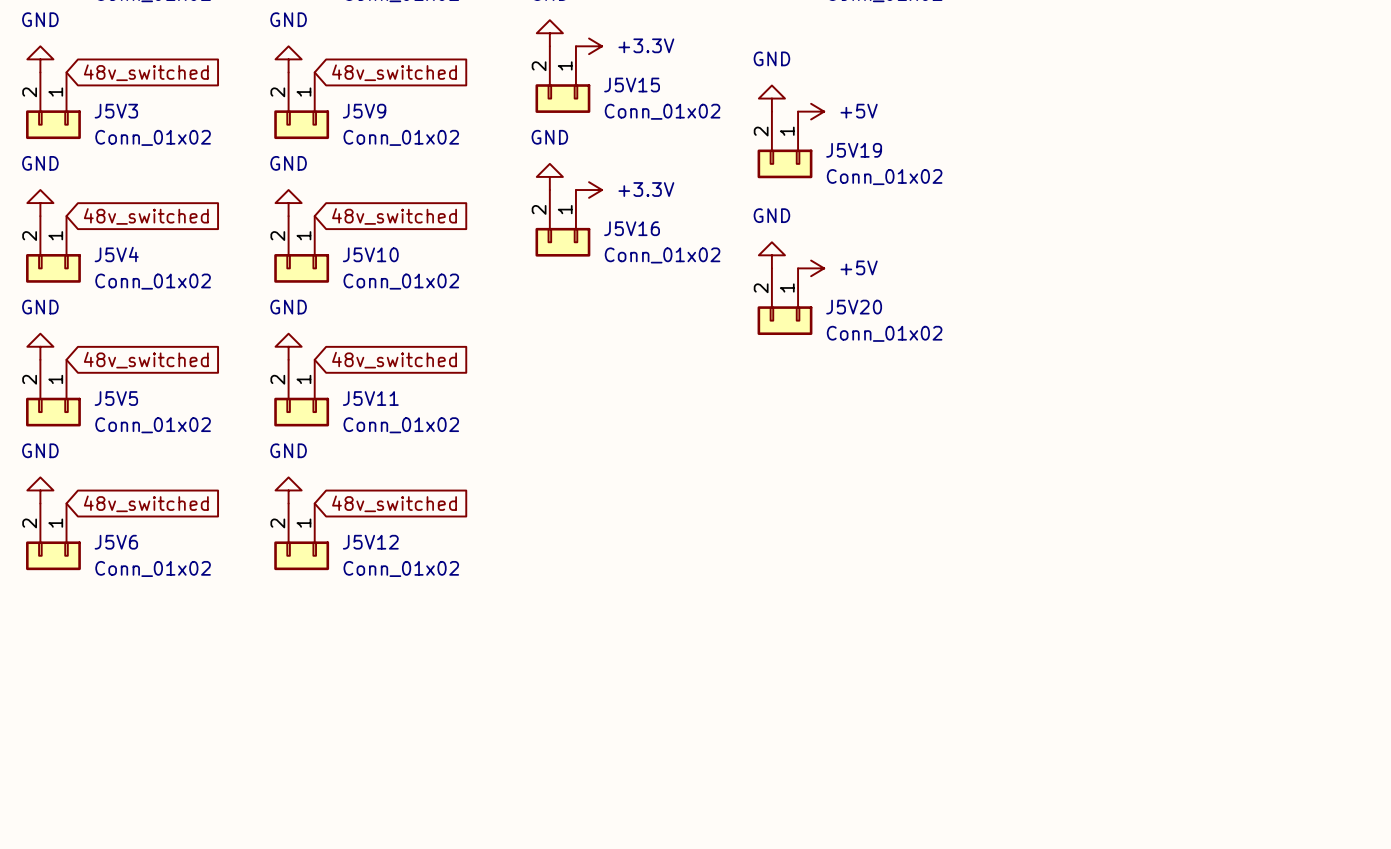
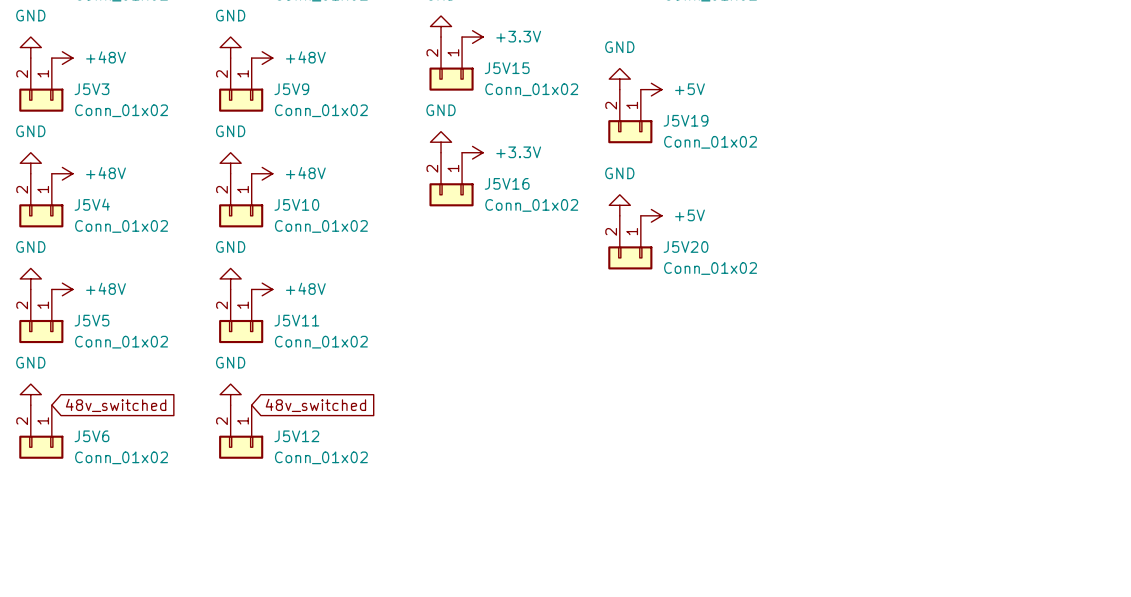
power symbol: none -> +48V (62, 58)
global label: 48v_switched (146, 72) -> none
power symbol: none -> +48V (262, 58)
global label: 48v_switched (394, 72) -> none
power symbol: none -> +48V (62, 173)
global label: 48v_switched (146, 216) -> none
power symbol: none -> +48V (262, 173)
global label: 48v_switched (394, 216) -> none
power symbol: none -> +48V (62, 289)
power symbol: none -> +48V (262, 289)
global label: 48v_switched (146, 360) -> none
global label: 48v_switched (394, 360) -> none

